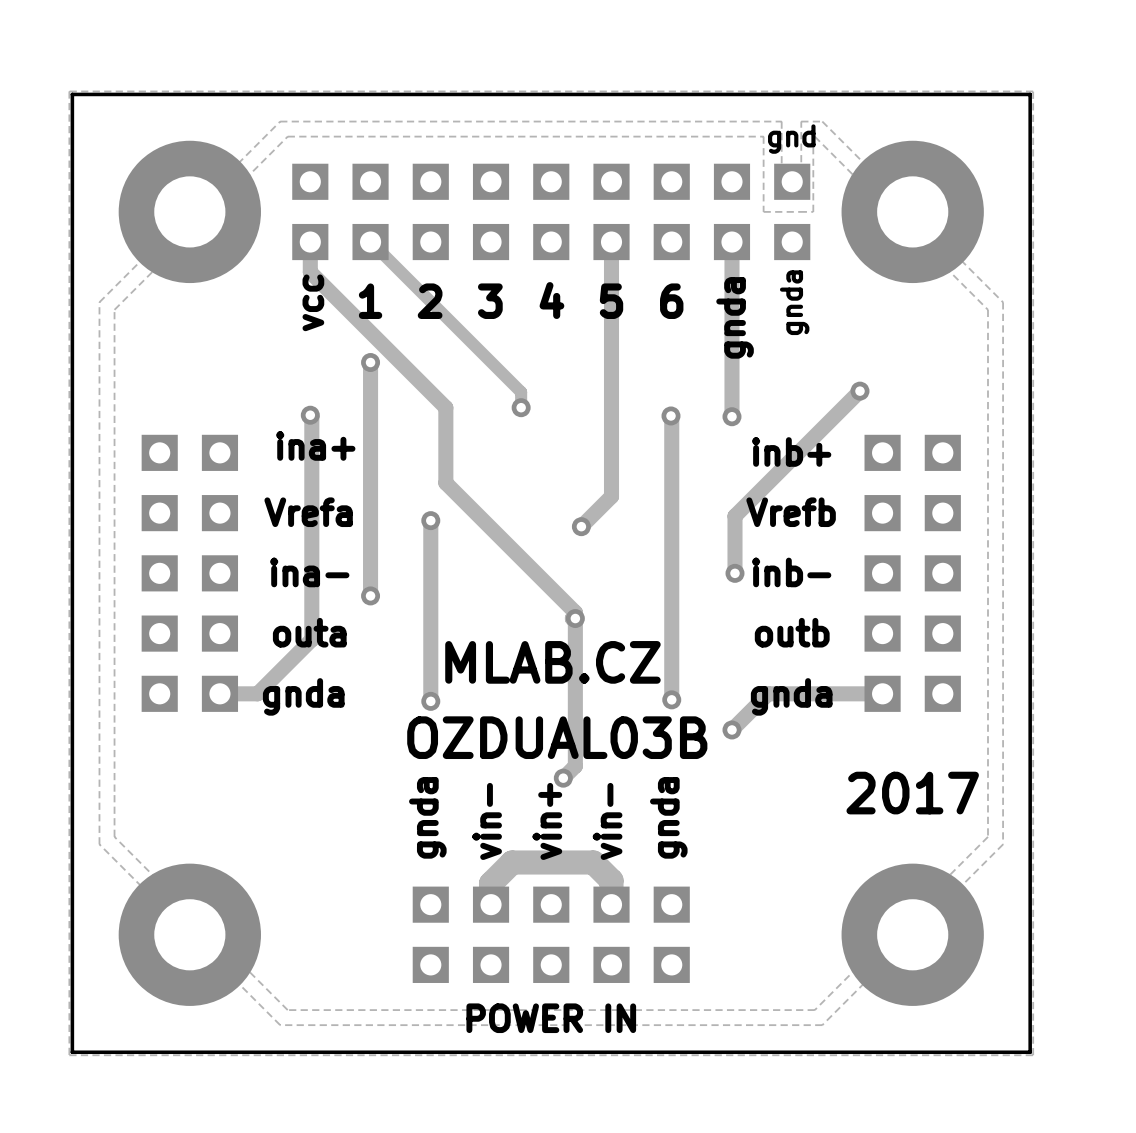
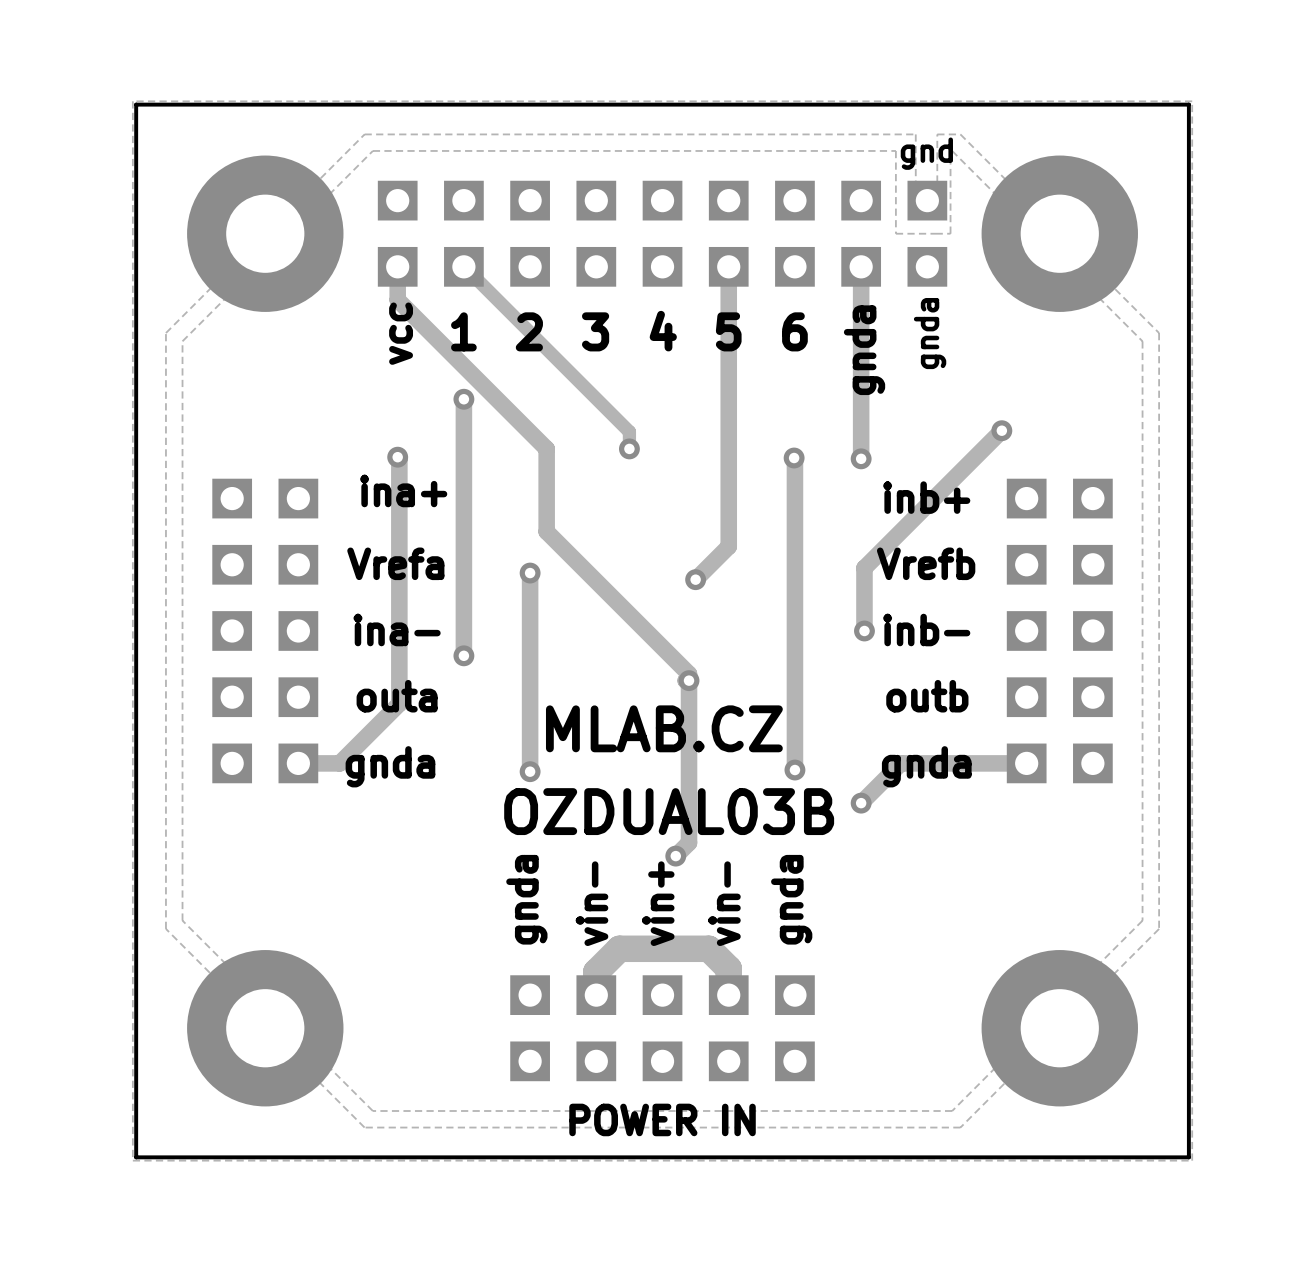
text: 2017 (912, 793) -> none

